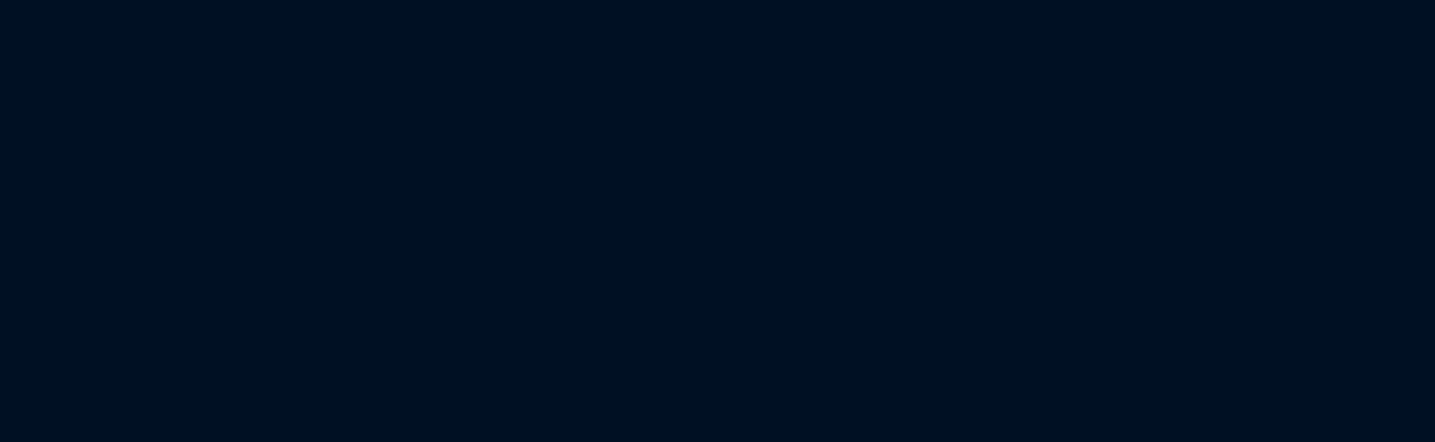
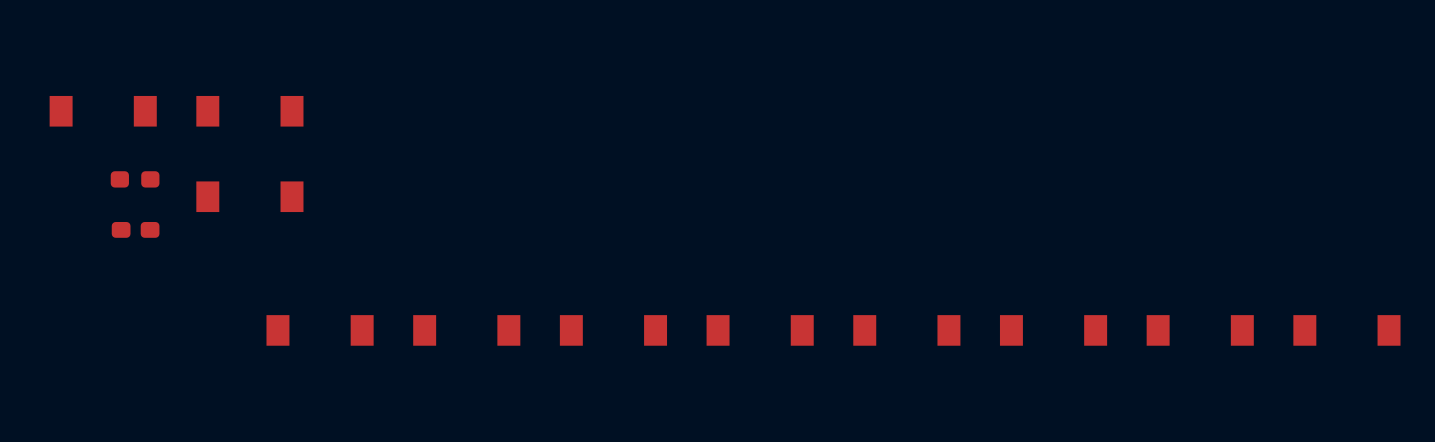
part: none -> (103, 111)
part: none -> (249, 111)
part: none -> (135, 179)
part: none -> (249, 196)
part: none -> (135, 229)
part: none -> (320, 330)
part: none -> (466, 330)
part: none -> (613, 330)
part: none -> (760, 330)
part: none -> (906, 330)
part: none -> (1053, 330)
part: none -> (1200, 330)
part: none -> (1346, 330)

